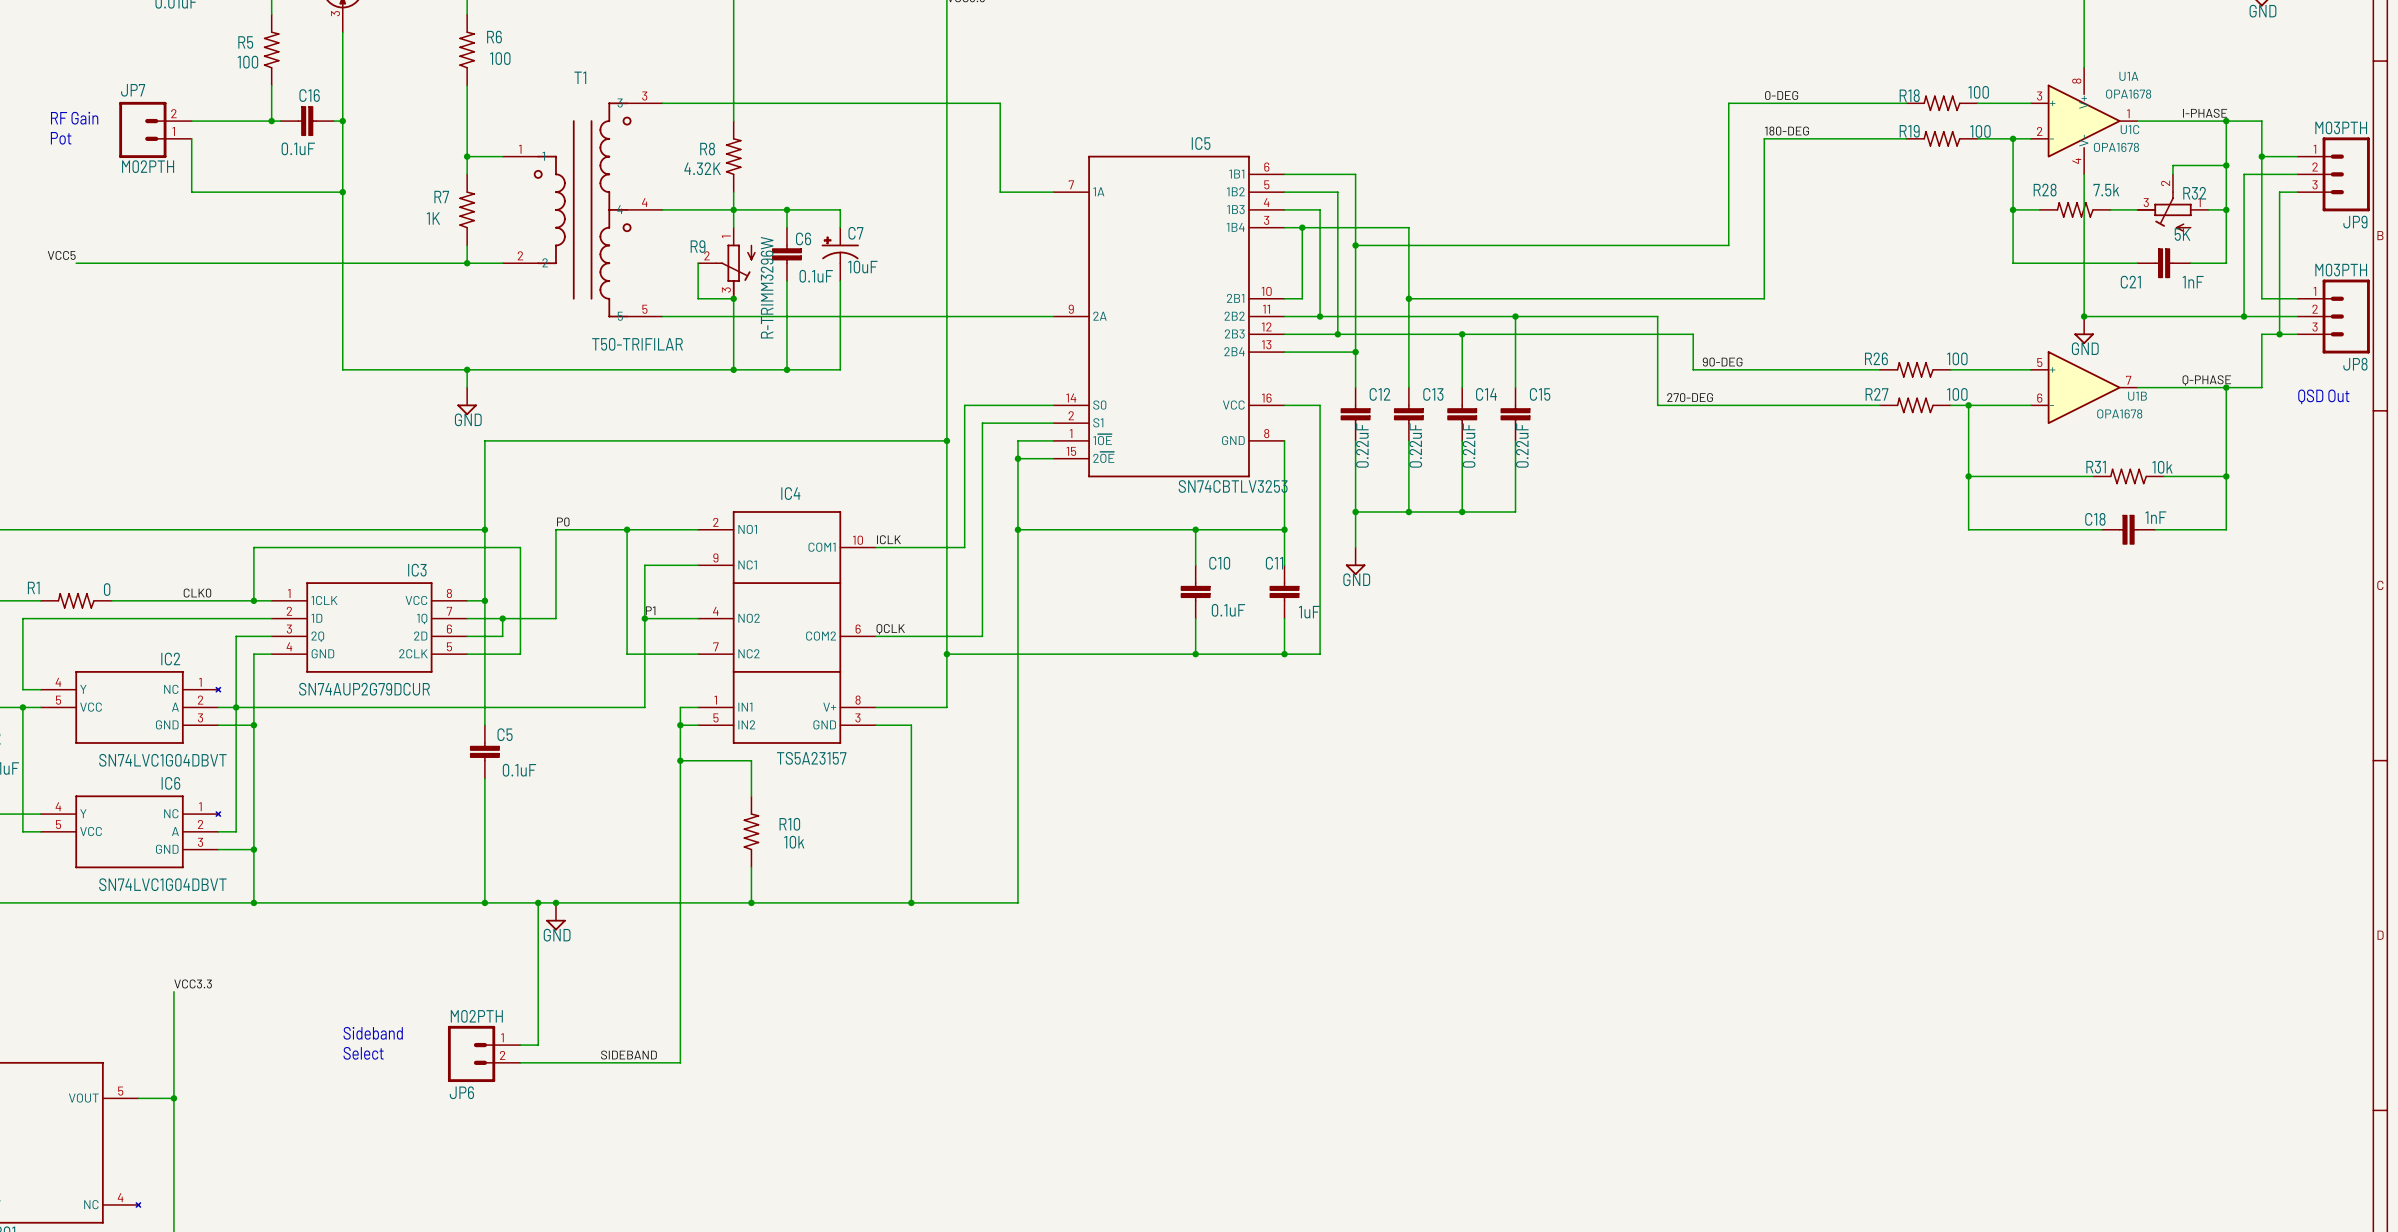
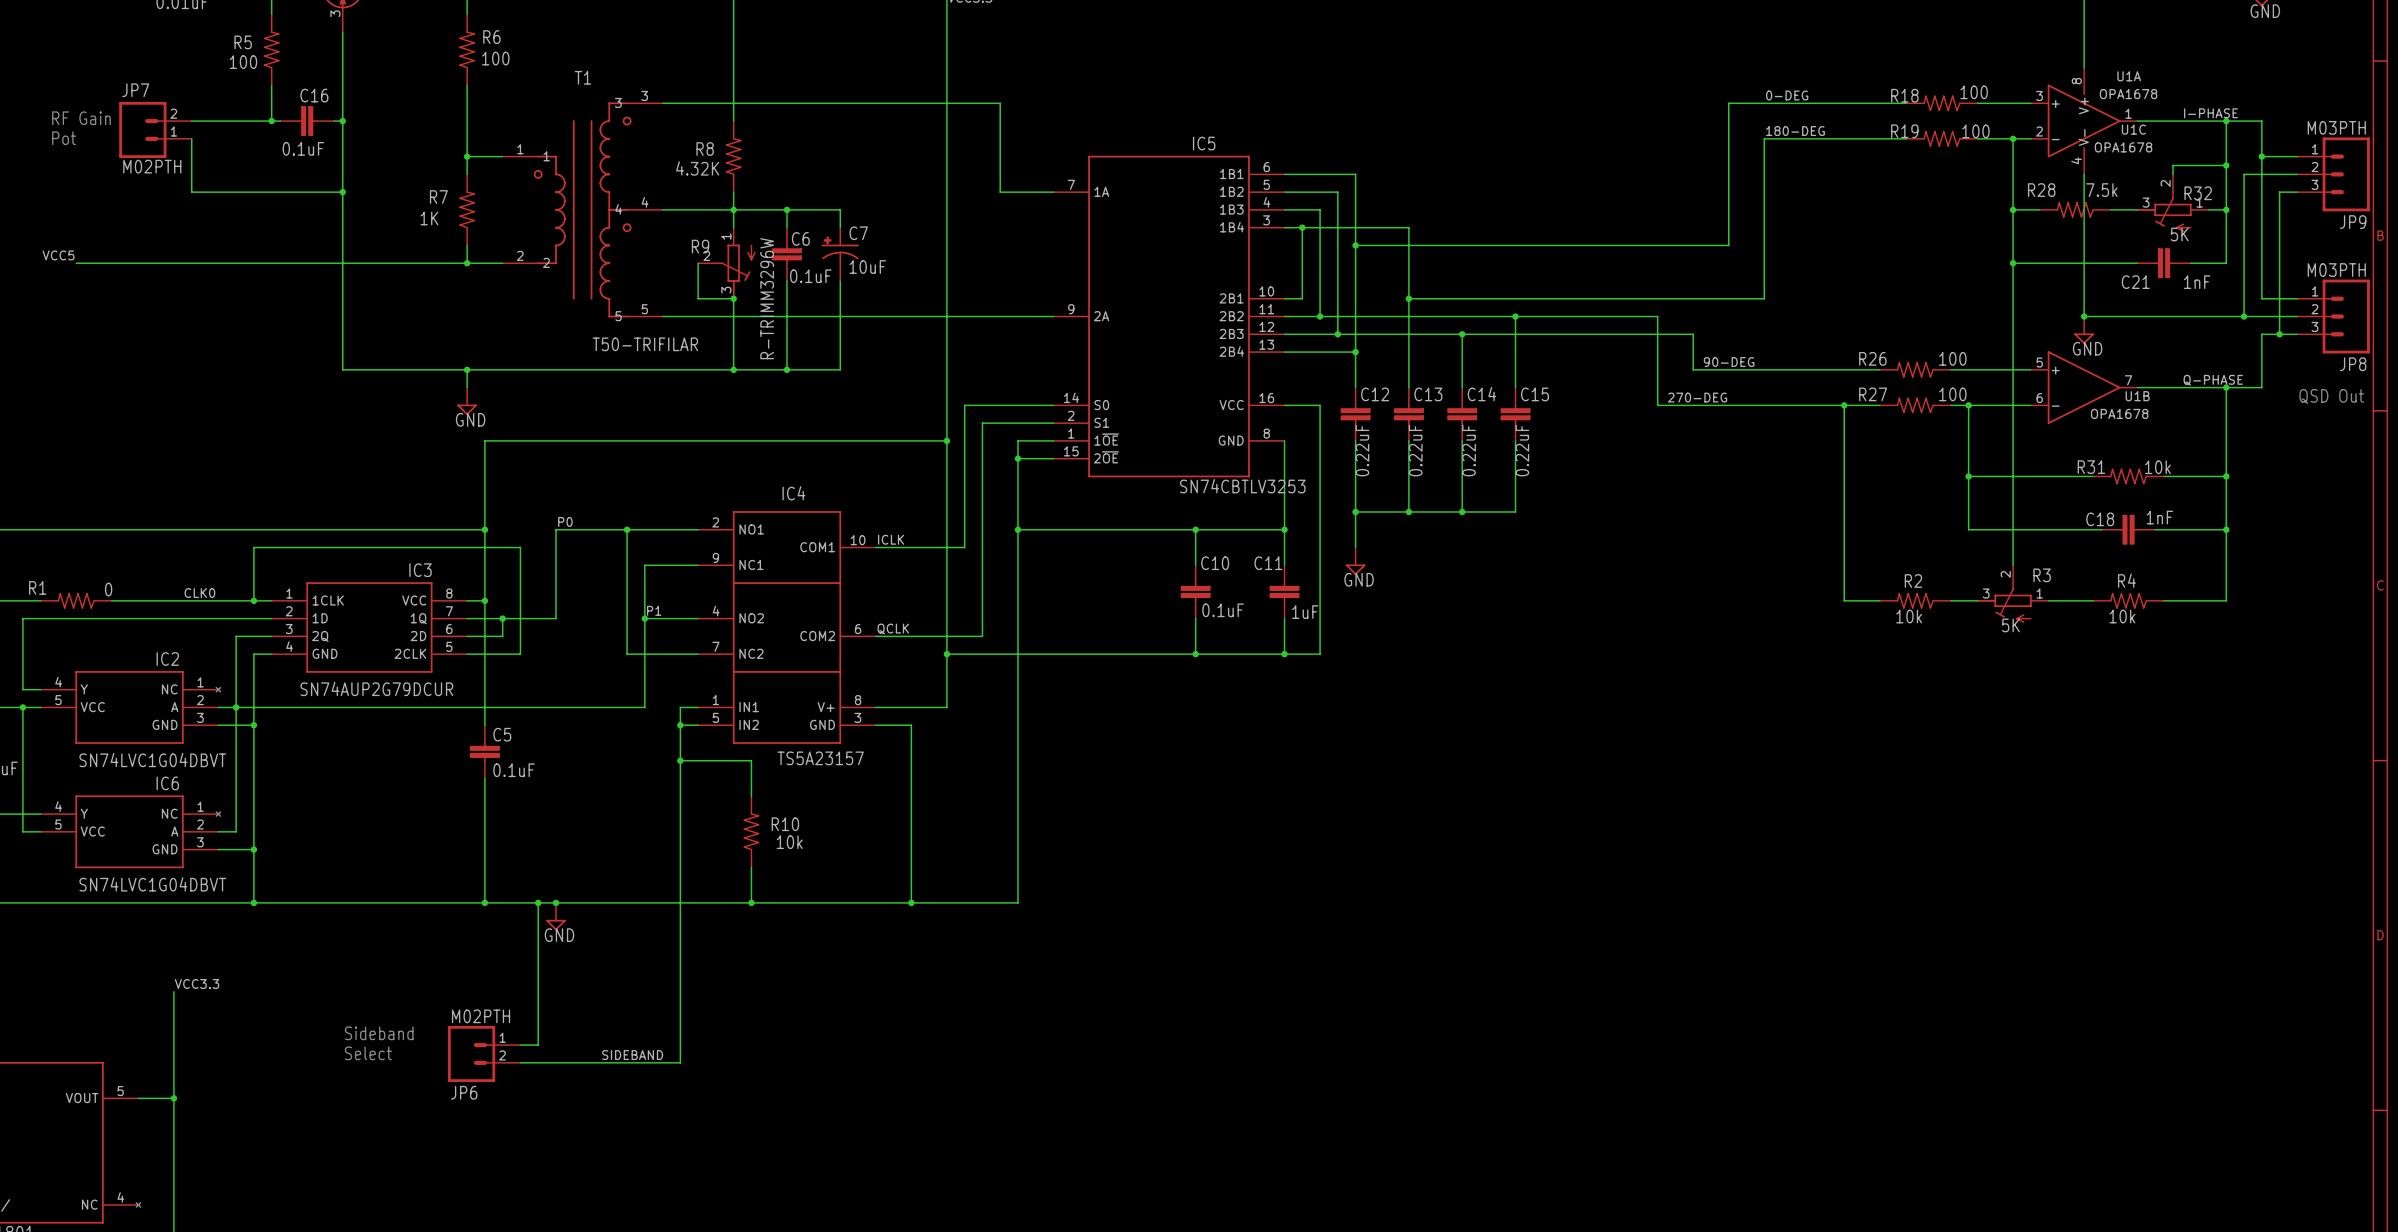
wire: none -> (2013, 263) (2013, 565)
junction: none -> (2013, 263)
wire: none -> (1844, 405) (1844, 600) (1879, 600)
junction: none -> (1844, 405)
wire: none -> (2226, 529) (2226, 600) (2164, 600)
junction: none -> (2226, 529)
R3: none -> 5K (2012, 594)
R2: none -> 10k (1915, 600)
wire: none -> (1950, 600) (1977, 600)
wire: none -> (2048, 600) (2093, 600)
R4: none -> 10k (2128, 600)

